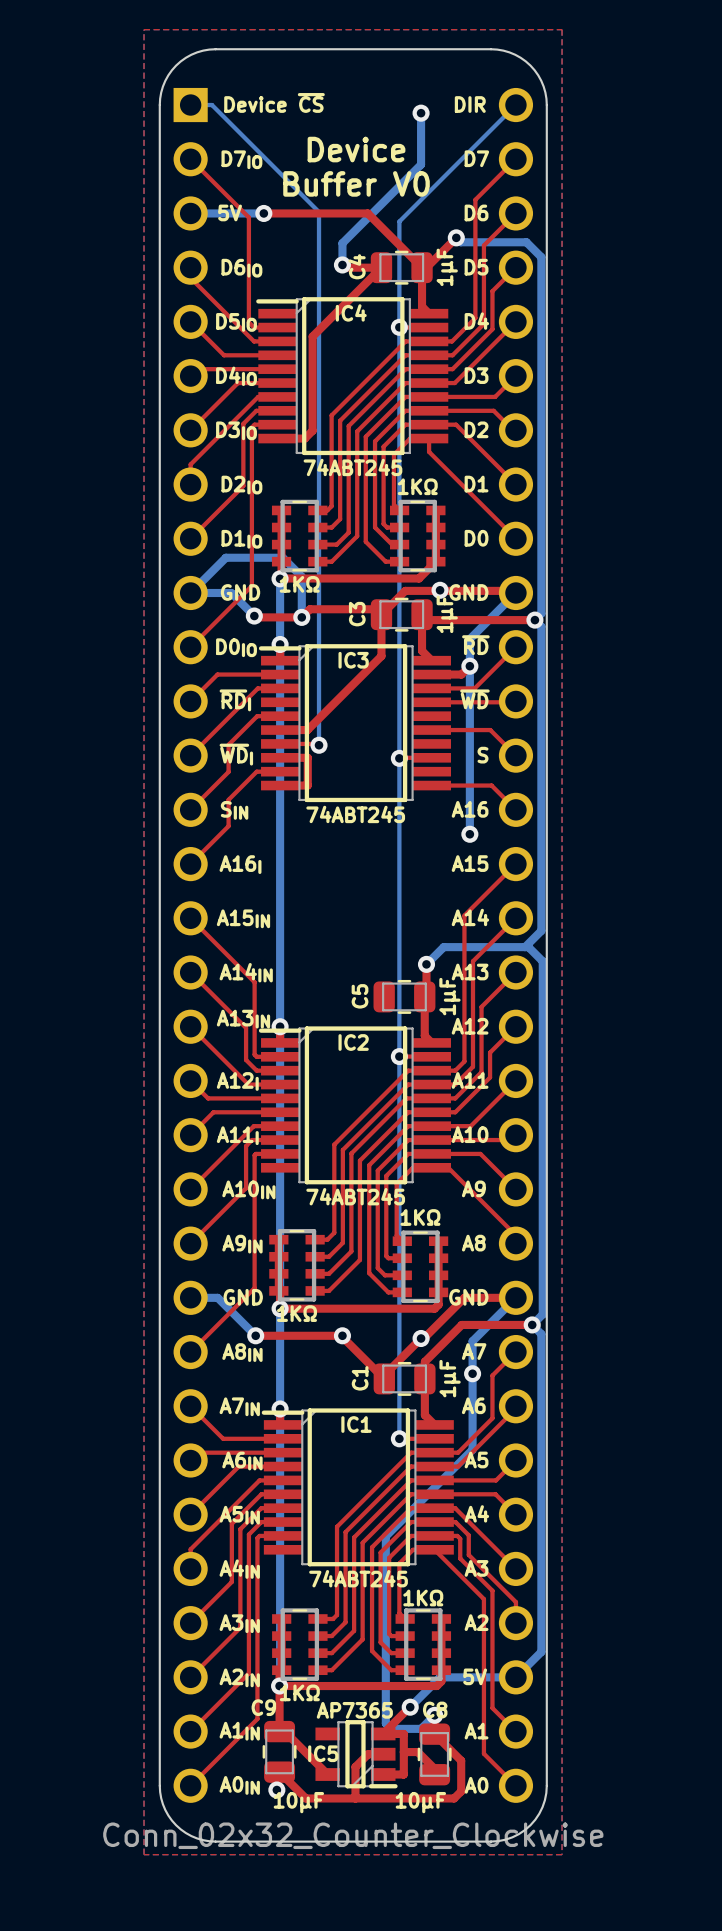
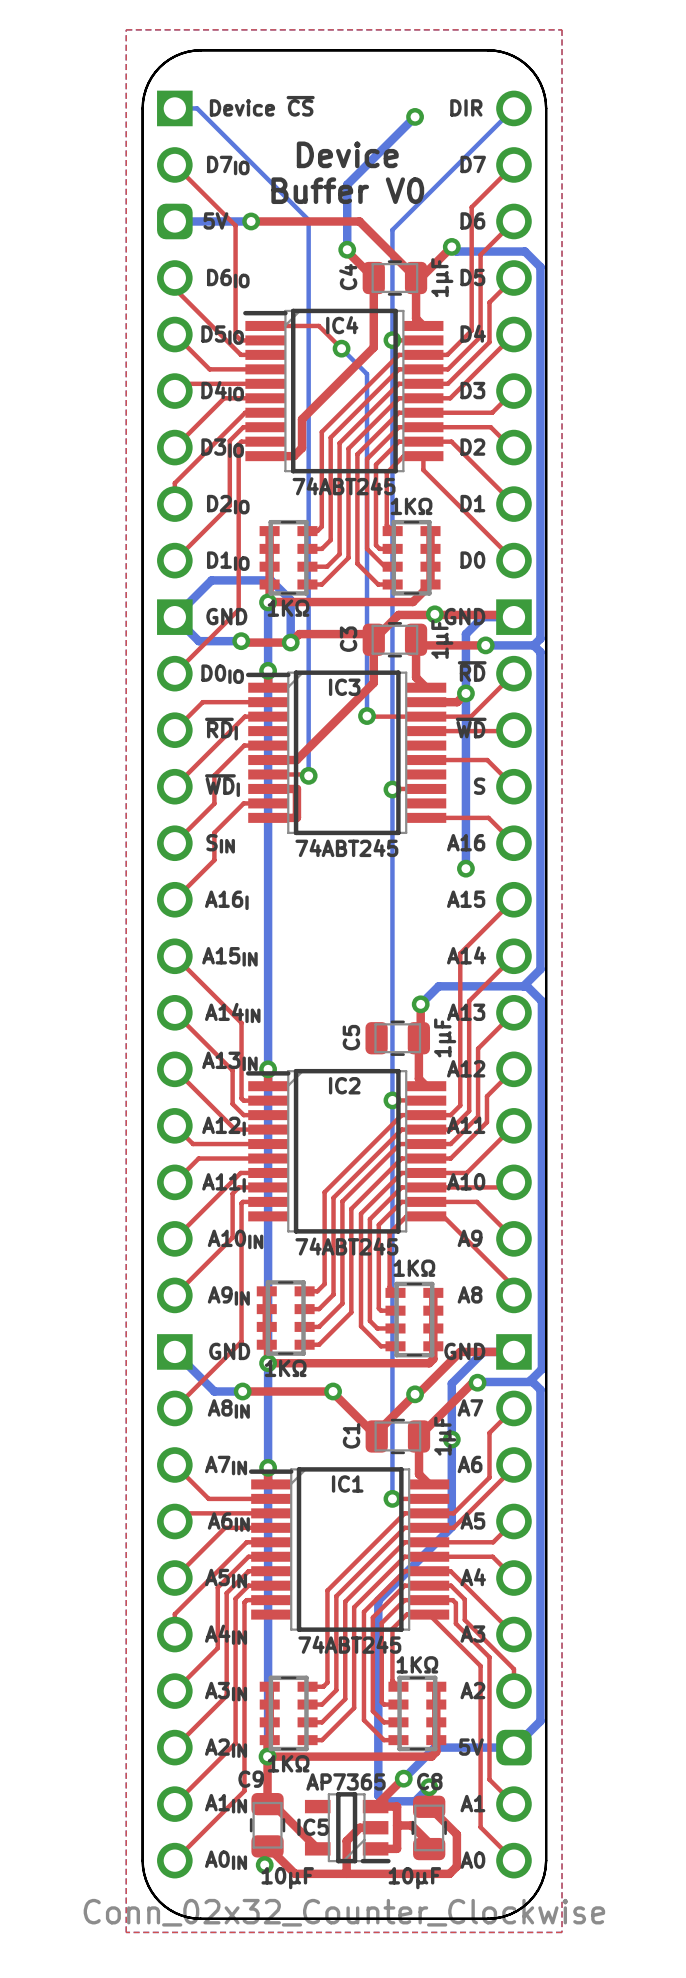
part footprint: [173, 87, 534, 1803] -> [141, 49, 548, 1920]
bottom track: (421, 113) (421, 164) (342, 243) (342, 264) -> (415, 116) (347, 184) (347, 249)
top track: (342, 264) (345, 267) (381, 267) (312, 336) (312, 403) -> (347, 249) (373, 278) (373, 347) (302, 419)
via position: (342, 264) -> (347, 249)
top track: none -> (265, 325) (318, 325) (341, 348)
bottom track: none -> (341, 348) (367, 374) (367, 716)
via: none -> (341, 348)
bottom track: (190, 592) (231, 592) (254, 616) -> (174, 617) (198, 641) (241, 641)
bottom track: (515, 592) (469, 639) -> (513, 617) (482, 617) (465, 634) (465, 665)
top track: (488, 620) (534, 620) -> none
bottom track: none -> (485, 645) (533, 645)
via position: (534, 620) -> (485, 645)
top track: none -> (367, 716) (426, 716)
via: none -> (367, 716)
bottom track: (190, 1297) (217, 1297) (255, 1335) -> (174, 1351) (214, 1391) (242, 1391)
bottom track: (515, 1297) (472, 1341) (472, 1449) (456, 1465) -> (513, 1351) (483, 1351) (451, 1383) (451, 1527)
top track: (532, 1324) (461, 1324) (424, 1361) (424, 1378) -> (477, 1382) (472, 1382) (419, 1436)
via: (532, 1324) -> none
bottom track: none -> (532, 1381) (477, 1382)
via: none -> (477, 1382)
via position: (472, 1373) -> (451, 1439)

